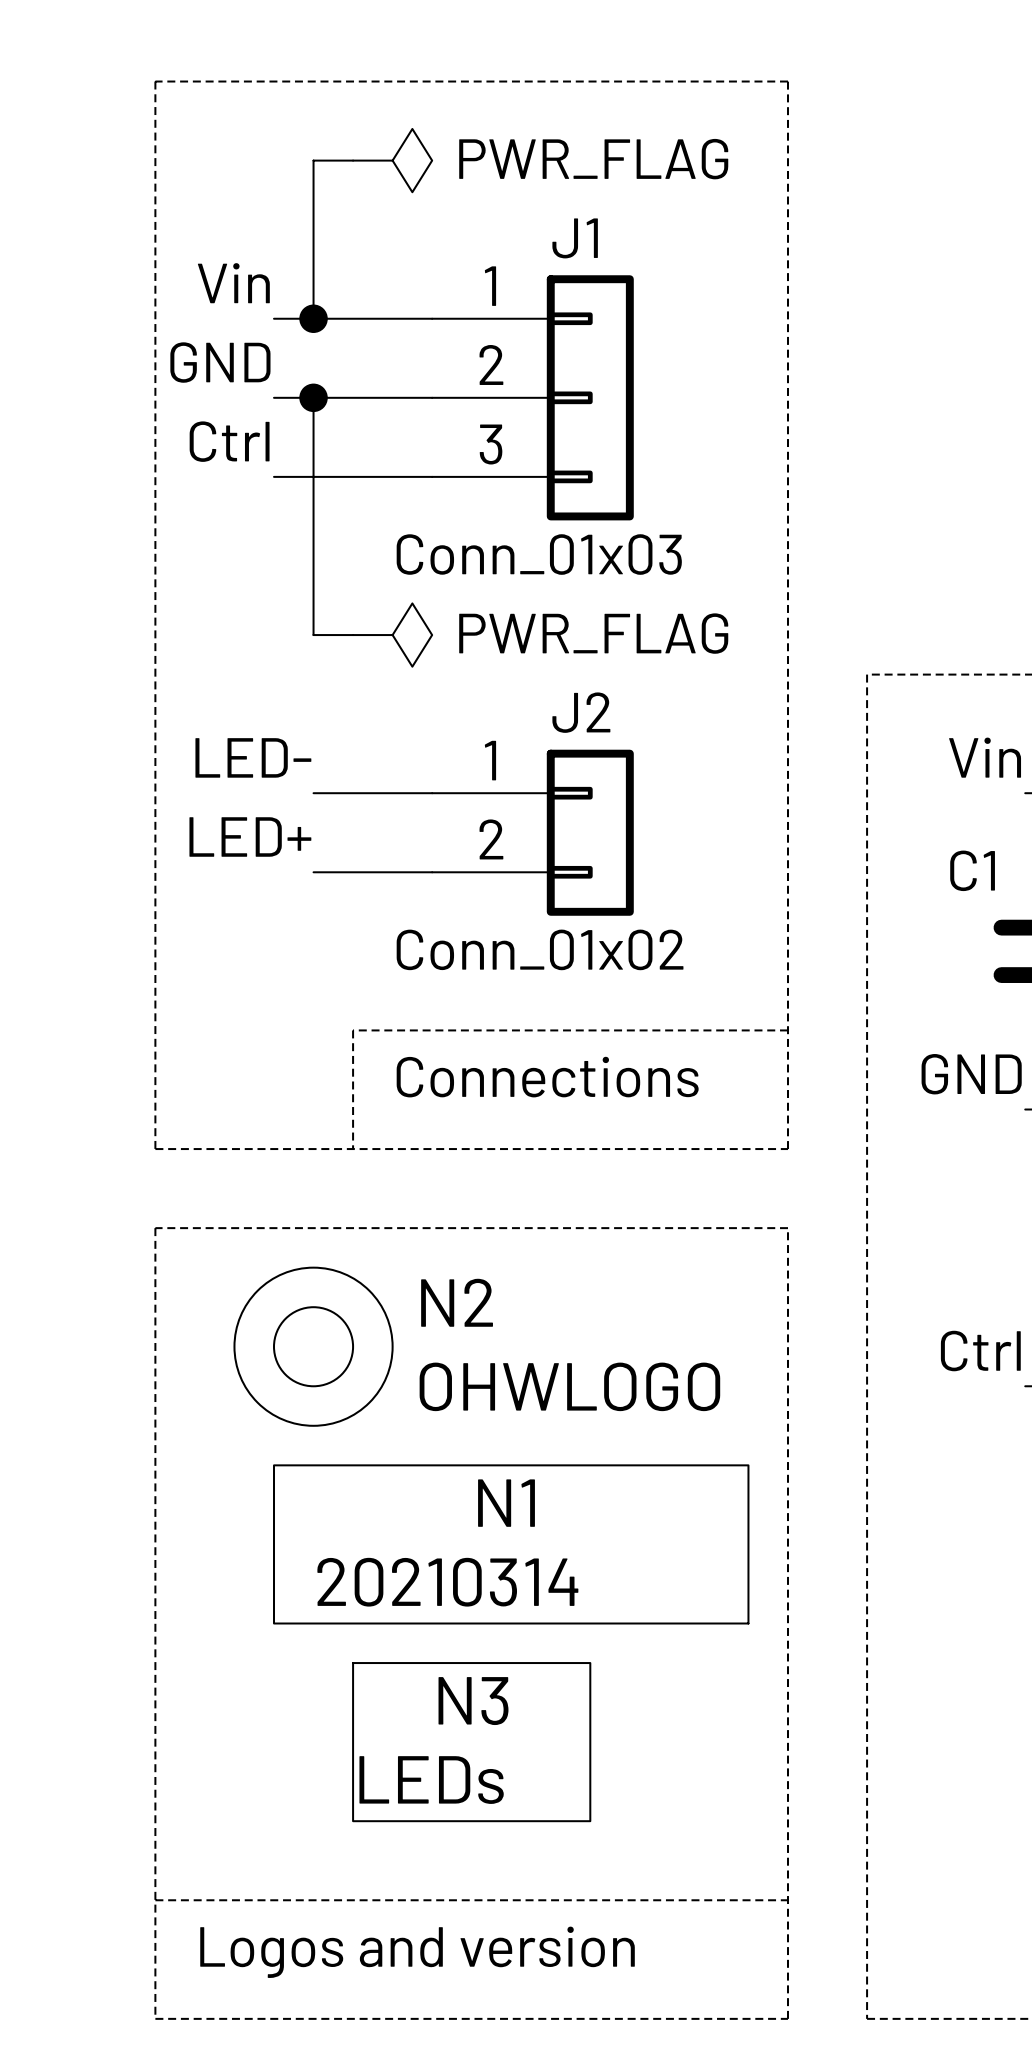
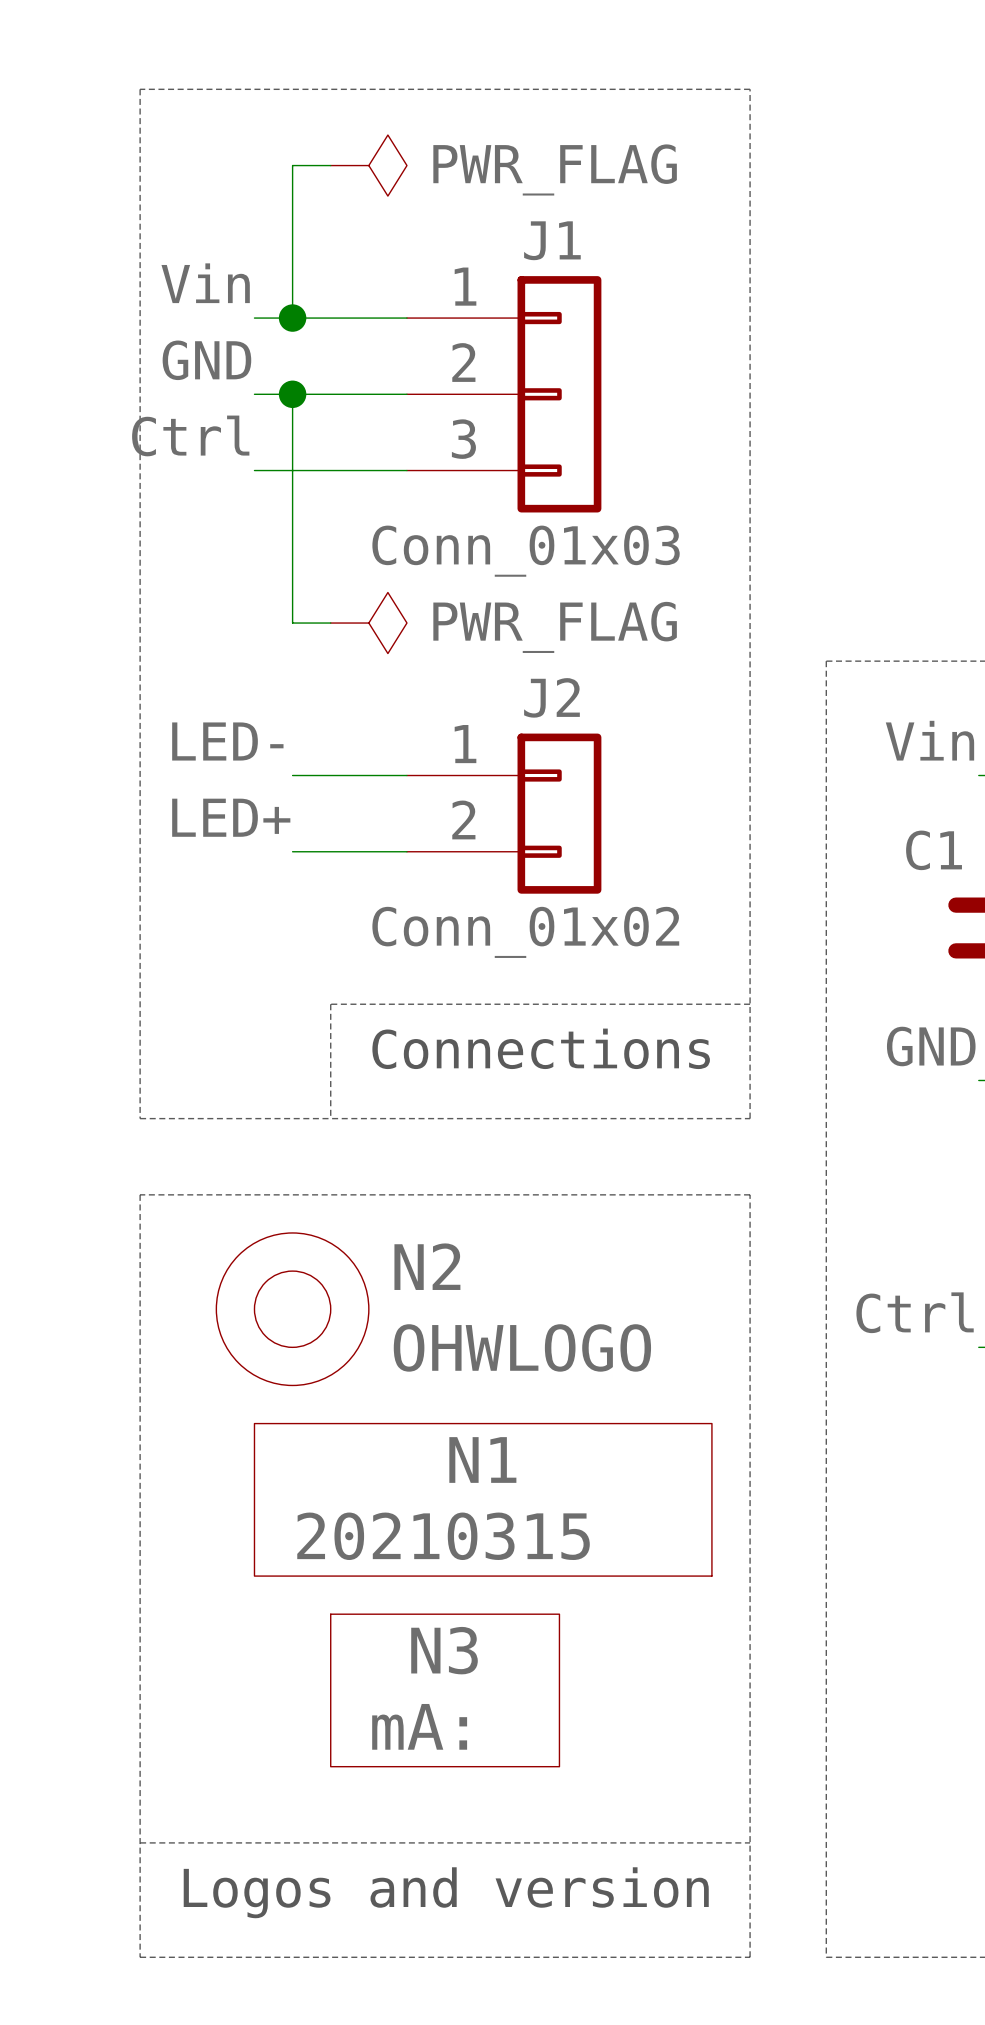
N1 value: 20210314 (447, 1582) -> 20210315 (443, 1536)
N3 value: LEDs (431, 1780) -> mA: (419, 1726)

